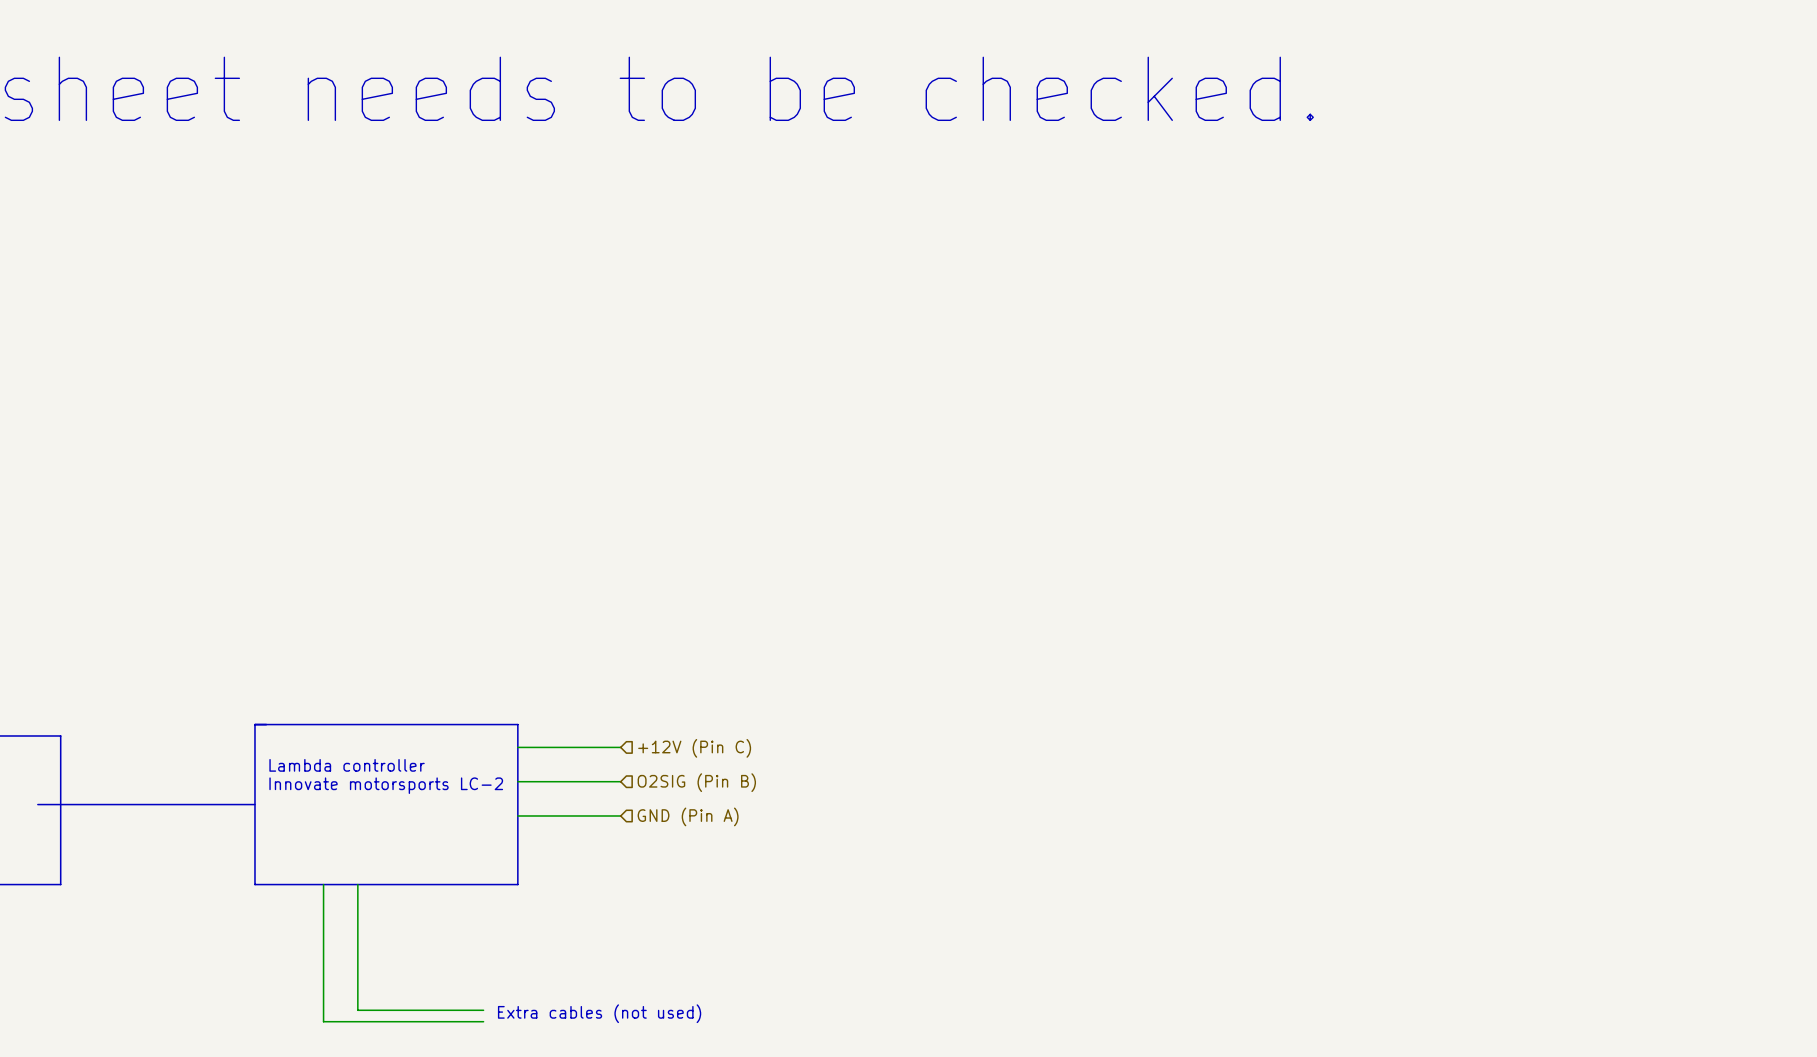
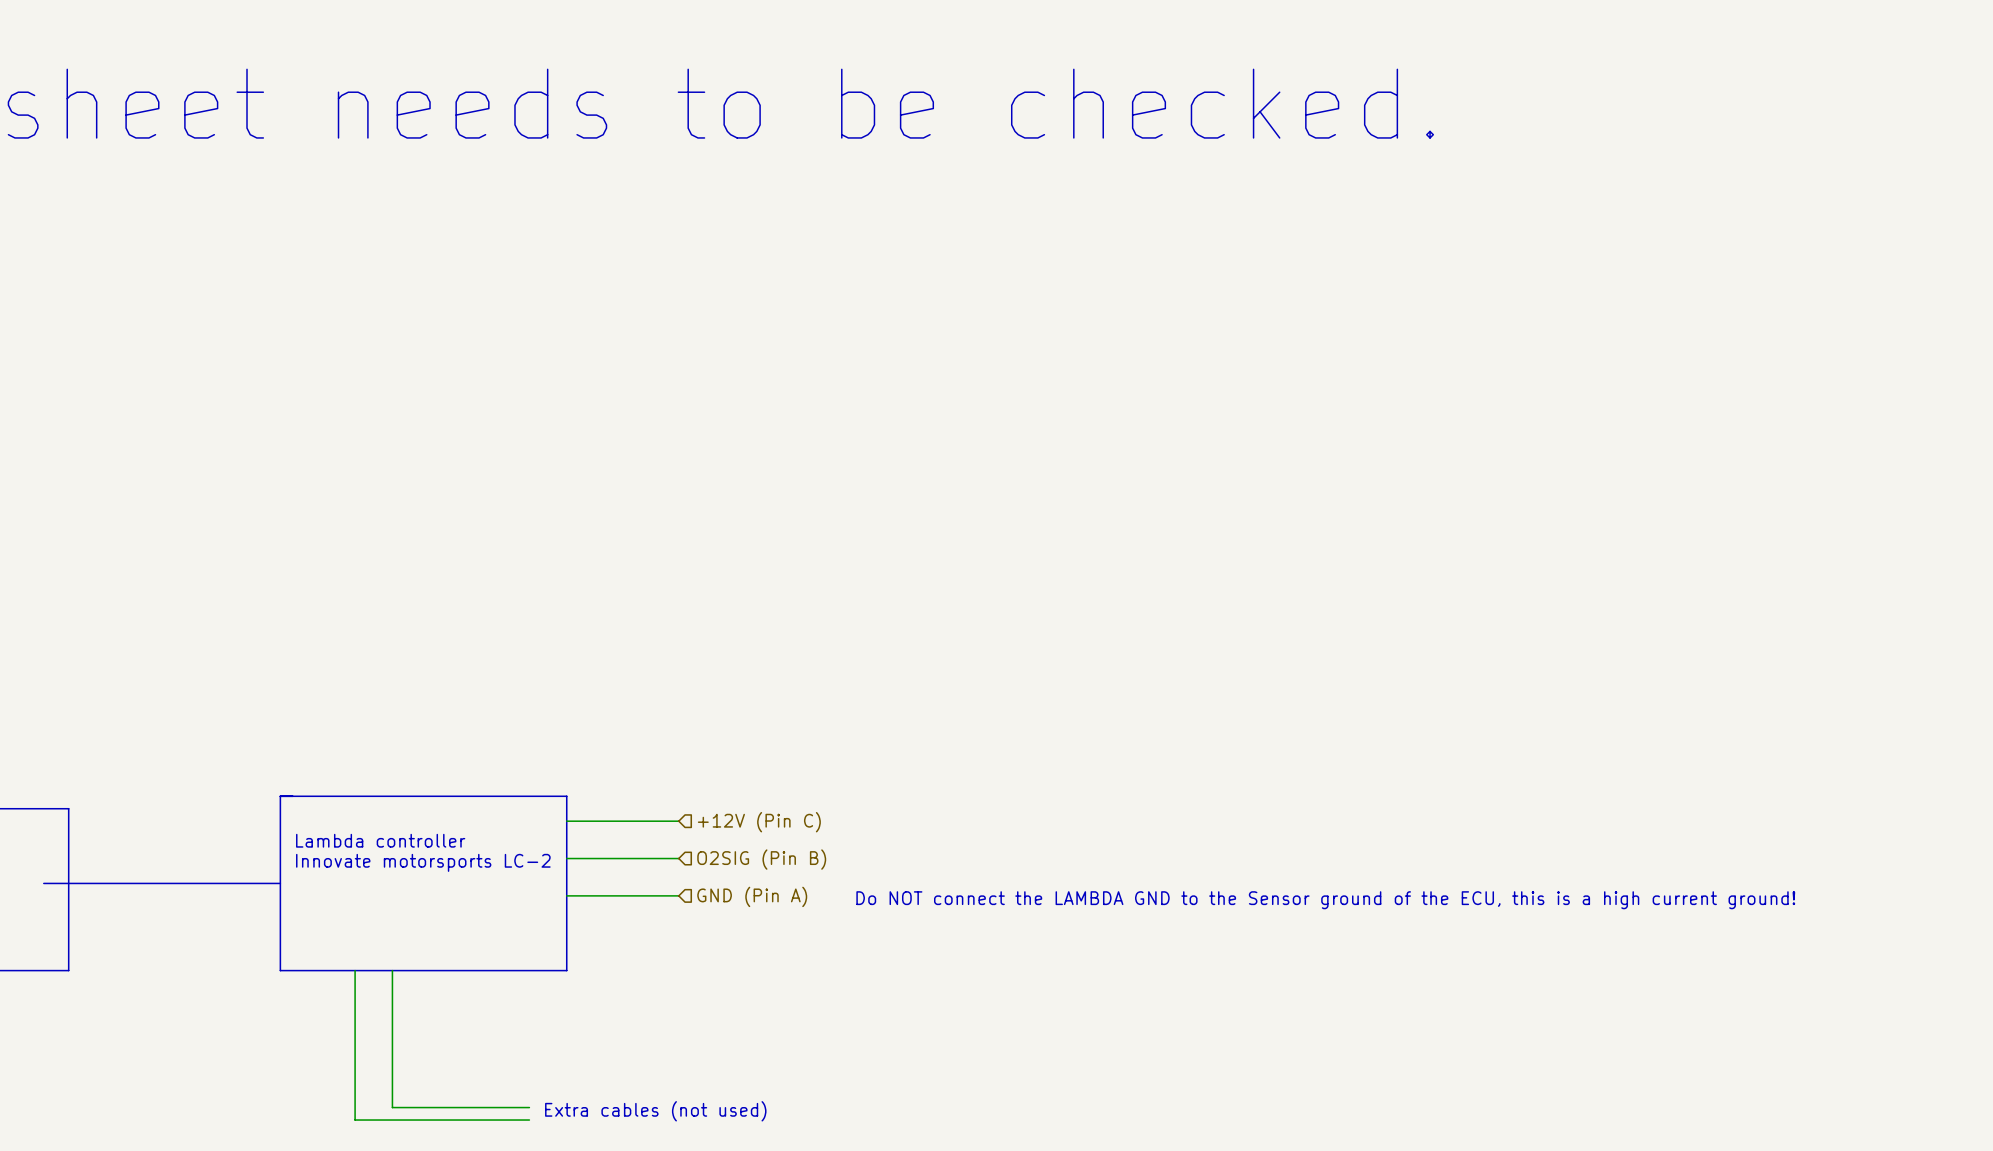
text: none -> Do NOT connect the LAMBDA GND to the Sensor ground of the ECU, this is a high current ground! (1325, 900)

